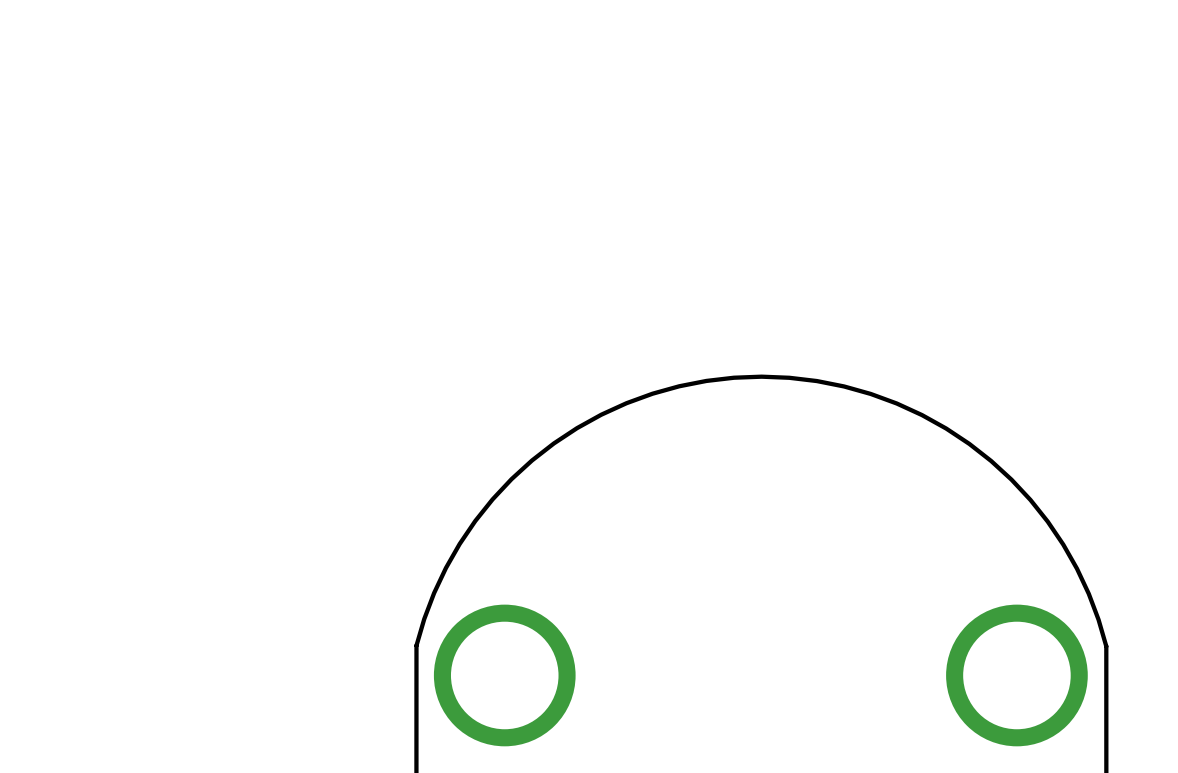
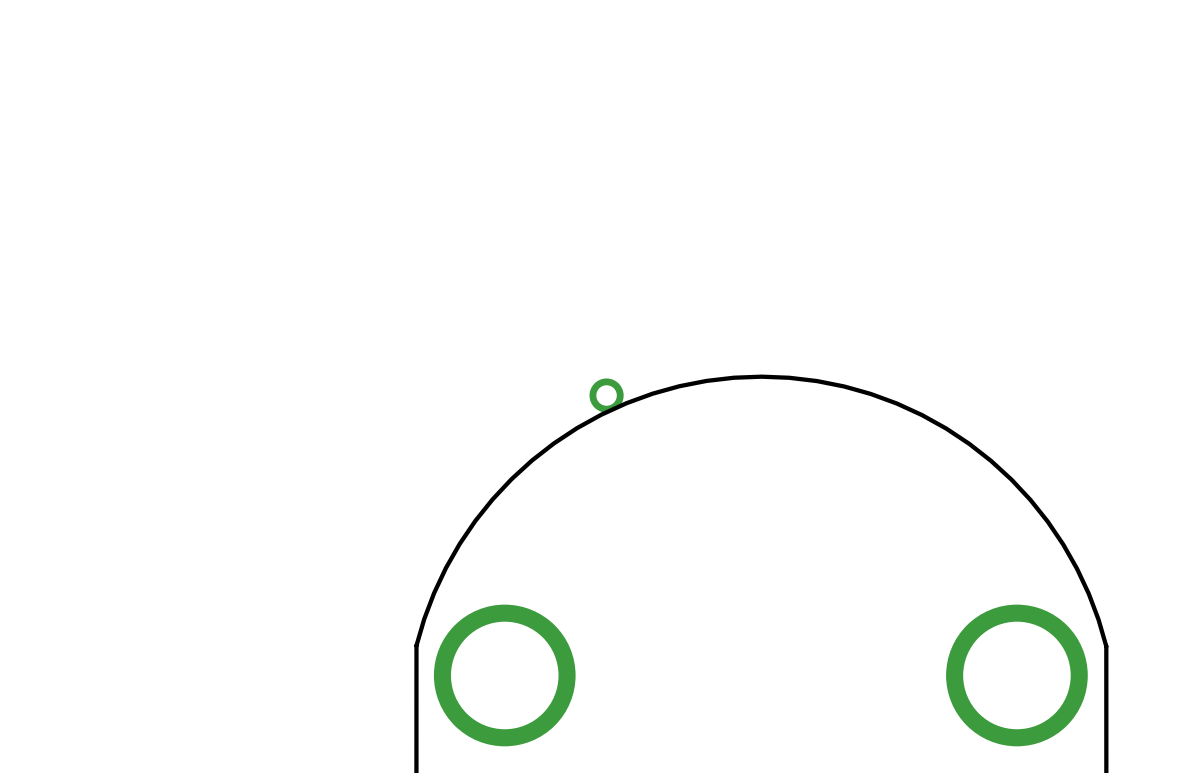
via: none -> (606, 395)

